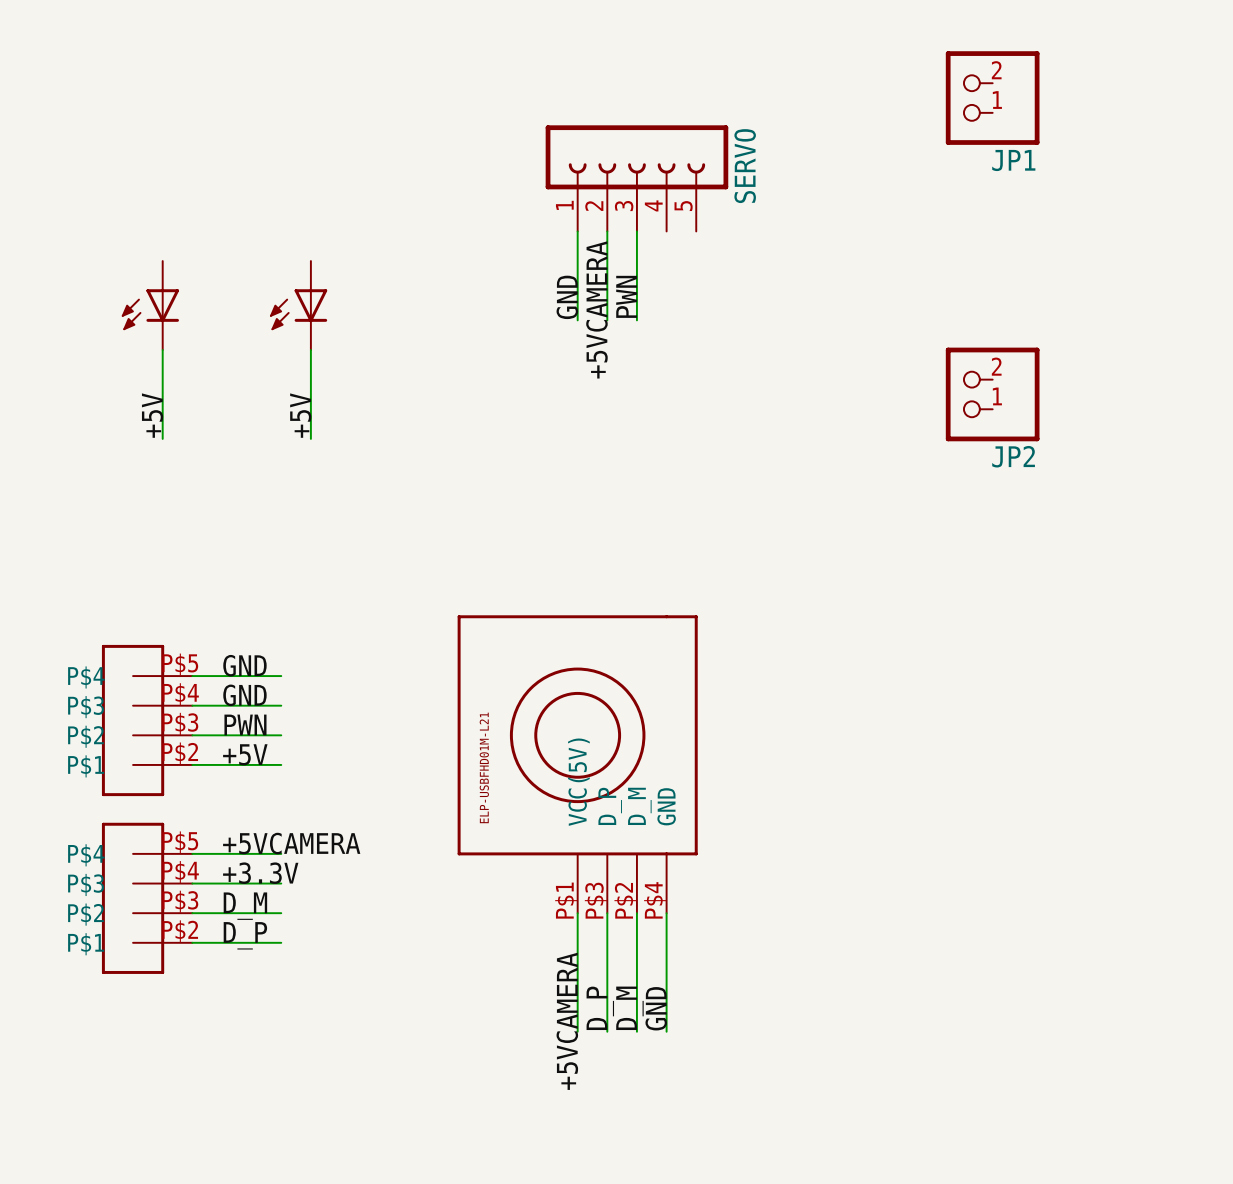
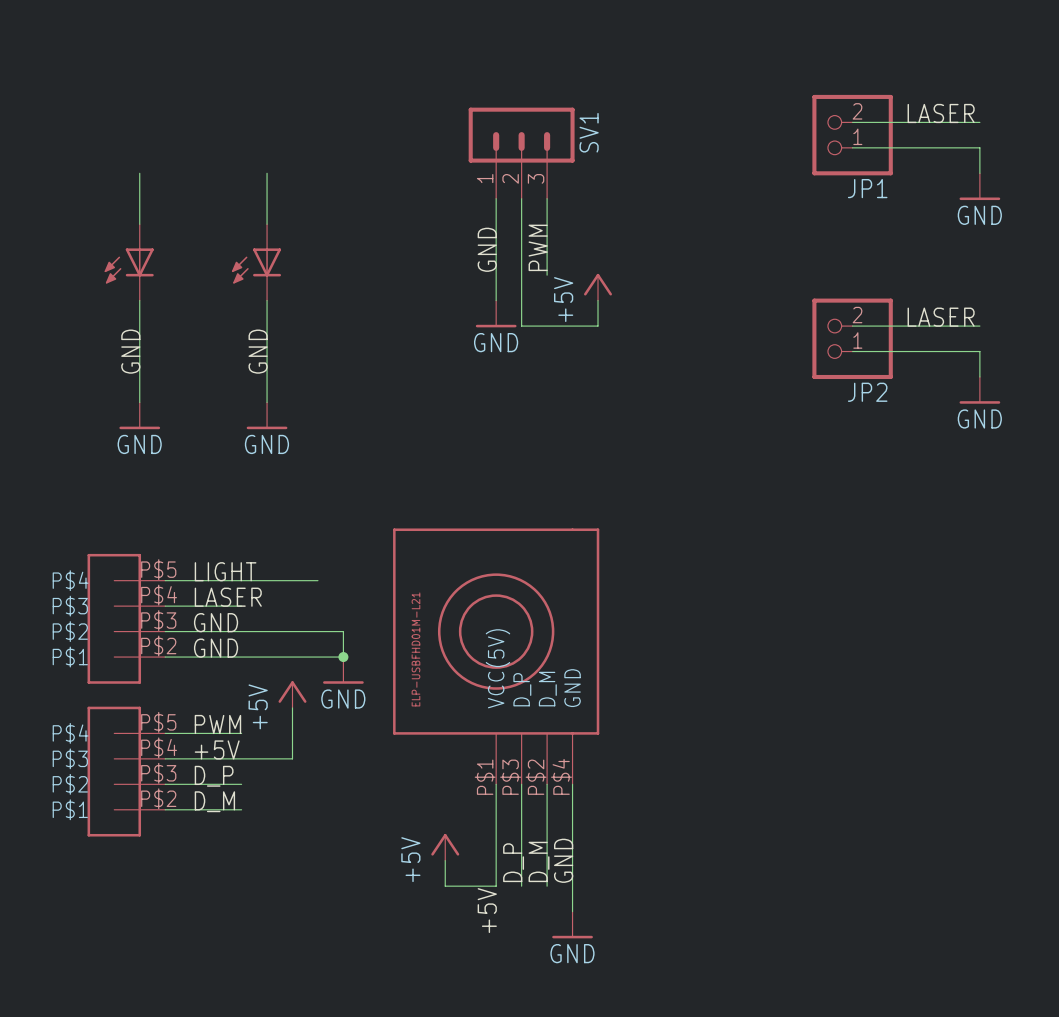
JP1 position: (992, 98) -> (852, 135)
label: none -> LASER (941, 113)
wire: none -> (852, 122) (979, 122)
wire: none -> (852, 147) (979, 147) (979, 173)
SV1: none -> (521, 153)
SERVO: (636, 178) -> none
wire: none -> (139, 173) (139, 224)
wire: none -> (267, 173) (267, 224)
power symbol: none -> GND (979, 186)
label: PWN (626, 296) -> PWM (538, 247)
label: +5VCAMERA (596, 309) -> none
wire: none -> (496, 275) (496, 300)
wire: none -> (521, 275) (521, 326) (598, 326) (598, 300)
power symbol: none -> +5V (598, 287)
power symbol: none -> GND (496, 313)
label: none -> LASER (941, 317)
wire: none -> (852, 326) (979, 326)
wire: none -> (852, 351) (979, 351) (979, 376)
label: +5V (152, 415) -> GND (130, 351)
label: +5V (300, 415) -> GND (258, 351)
wire: none -> (139, 376) (139, 402)
wire: none -> (267, 376) (267, 402)
power symbol: none -> GND (979, 390)
power symbol: none -> GND (139, 415)
power symbol: none -> GND (267, 415)
label: GND (244, 665) -> LIGHT (225, 571)
wire: none -> (241, 580) (317, 580)
label: GND (244, 695) -> LASER (228, 597)
label: PWN (245, 724) -> GND (216, 622)
wire: none -> (241, 631) (343, 631) (343, 657) (241, 657)
label: +5V (245, 754) -> GND (216, 648)
junction: none -> (343, 657)
power symbol: none -> GND (343, 670)
power symbol: none -> +5V (292, 694)
wire: none -> (292, 707) (292, 758) (241, 758)
label: +5VCAMERA (291, 843) -> PWM (217, 724)
label: +3.3V (260, 873) -> +5V (217, 749)
label: D_M (245, 906) -> D_P (214, 776)
label: D_P (245, 935) -> D_M (214, 801)
power symbol: none -> +5V (445, 847)
wire: none -> (445, 860) (445, 886) (496, 886)
label: +5VCAMERA (567, 1021) -> +5V (487, 910)
wire: none -> (572, 886) (572, 911)
power symbol: none -> GND (572, 924)

